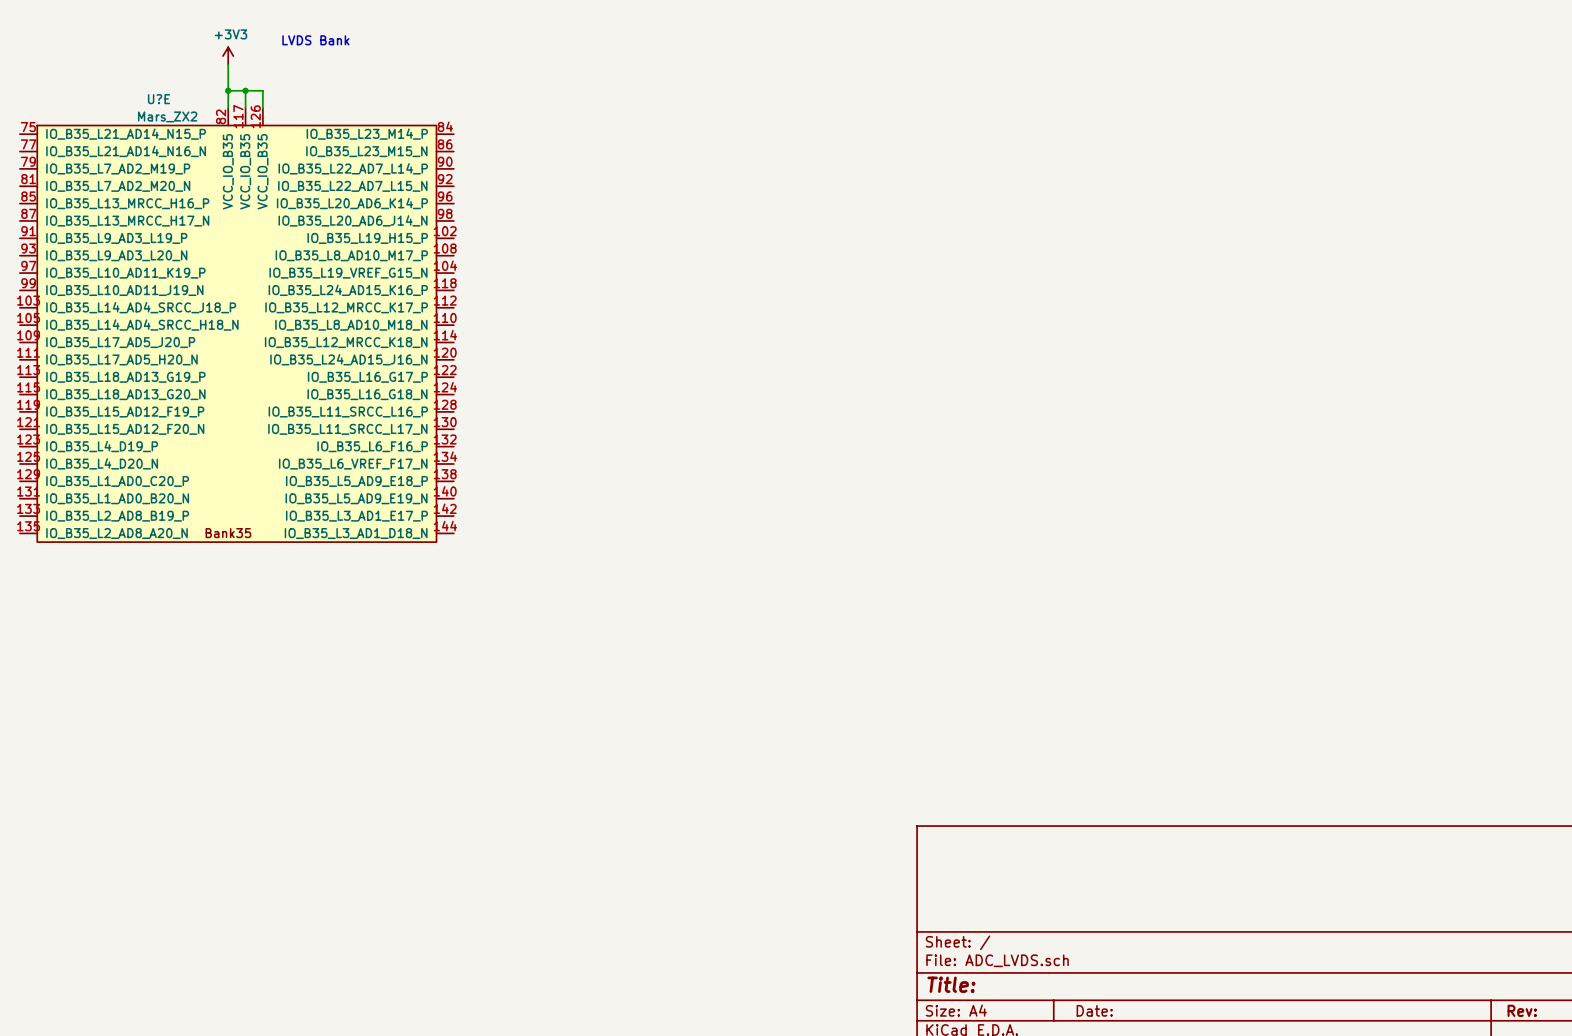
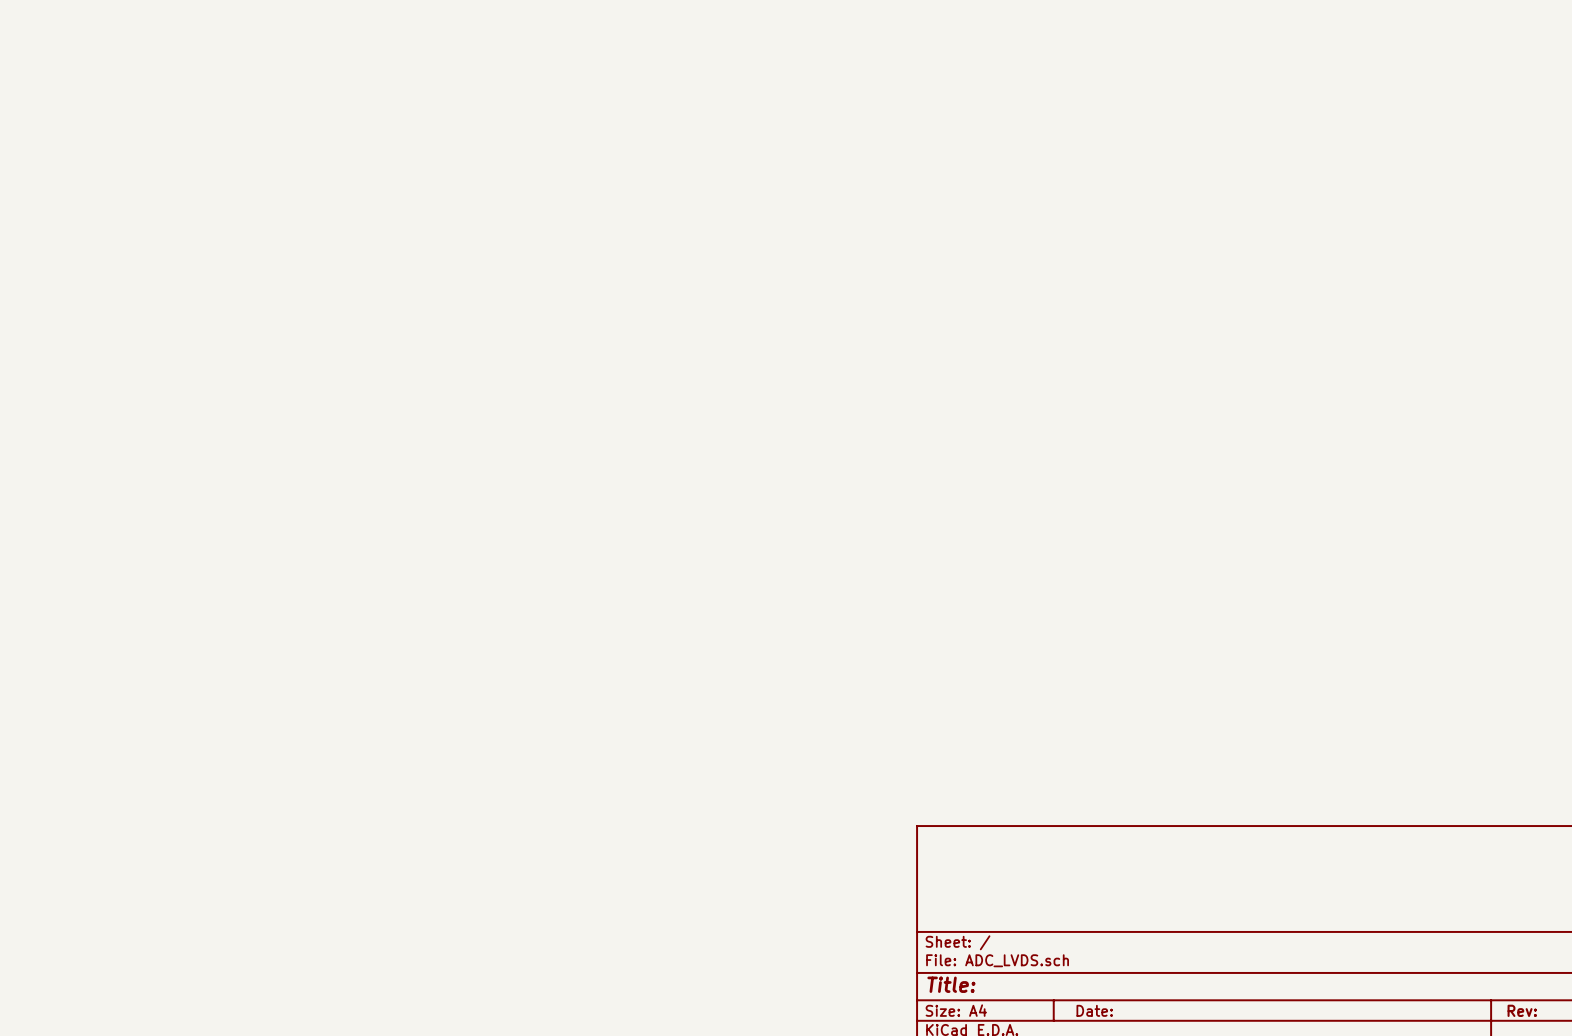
text: LVDS Bank (315, 40) -> none
power symbol: +3V3 (228, 56) -> none
wire: (228, 64) (228, 108) -> none
wire: (228, 90) (262, 90) (262, 108) -> none
junction: (228, 90) -> none
wire: (245, 90) (245, 108) -> none
junction: (245, 90) -> none
U?E: Mars_ZX2 (236, 325) -> none

